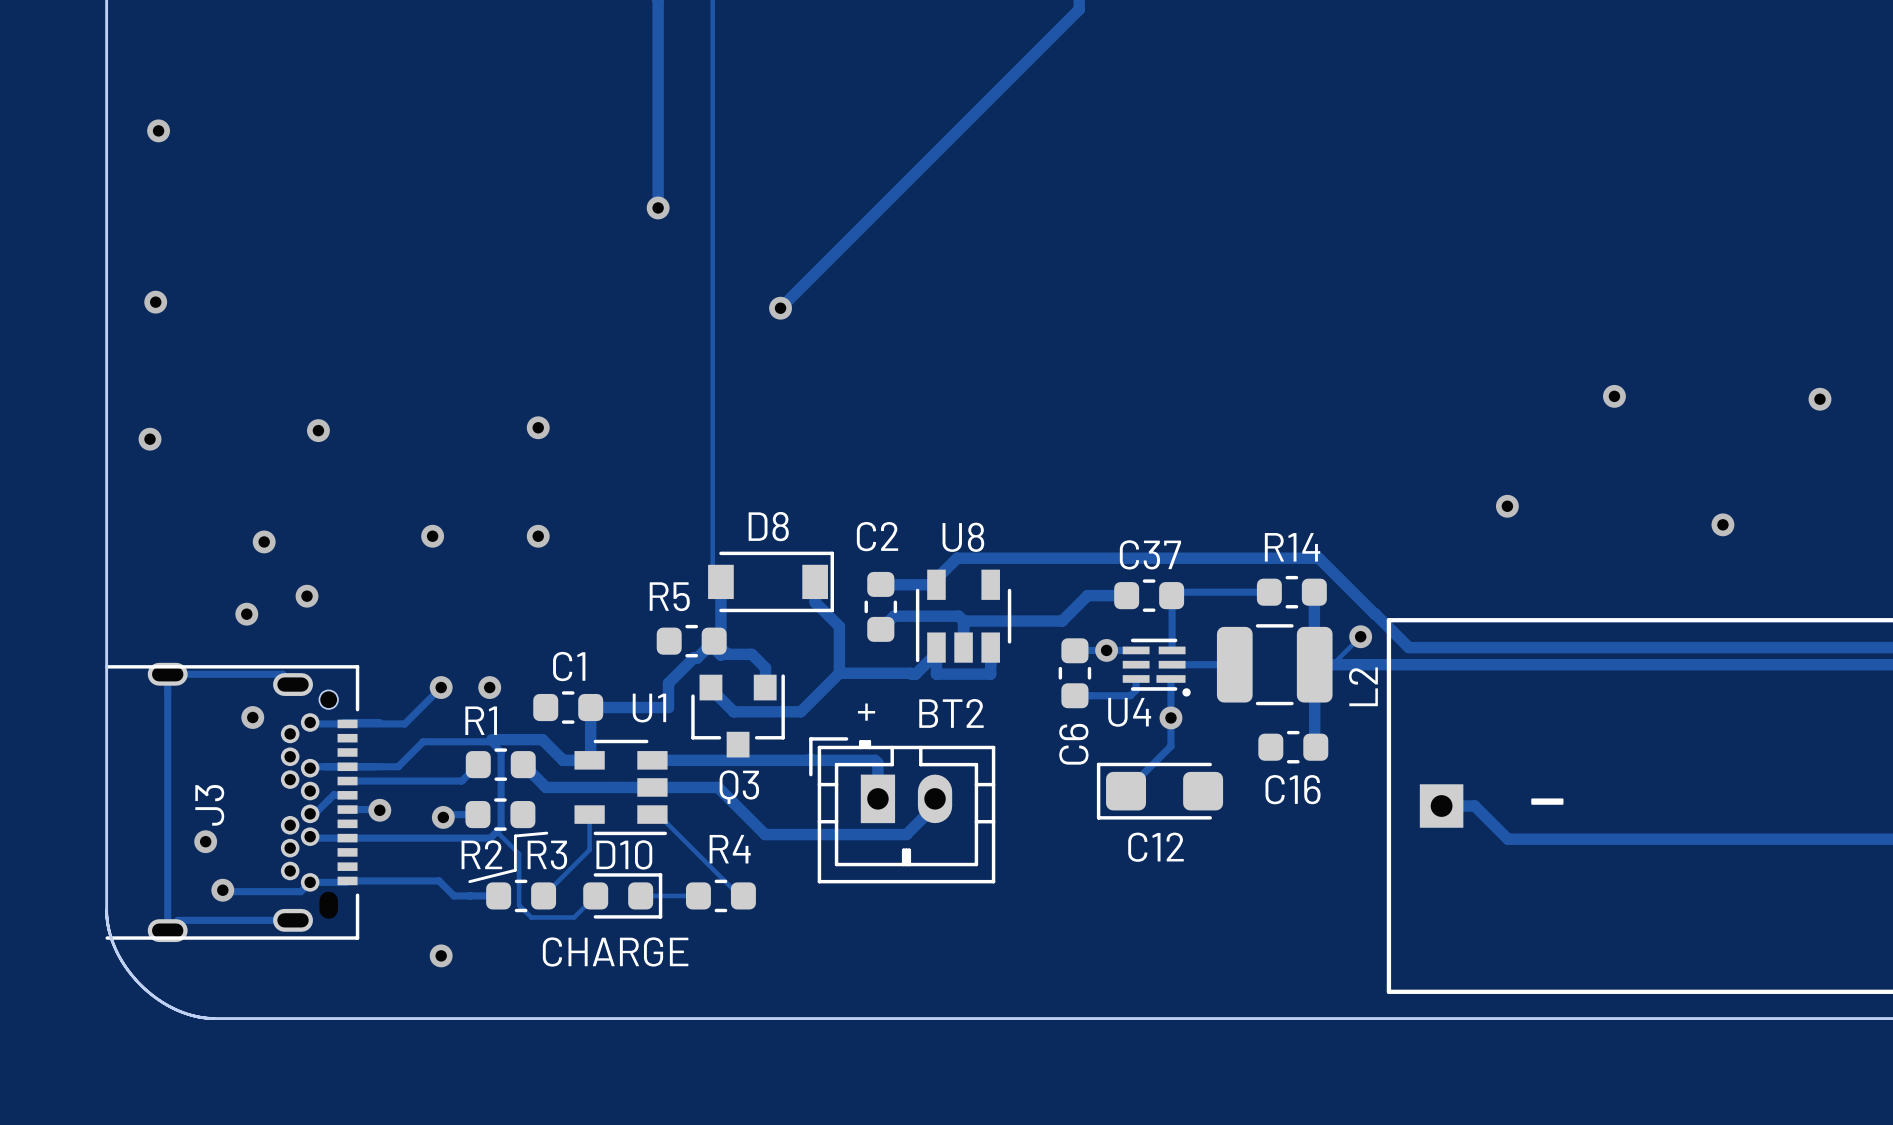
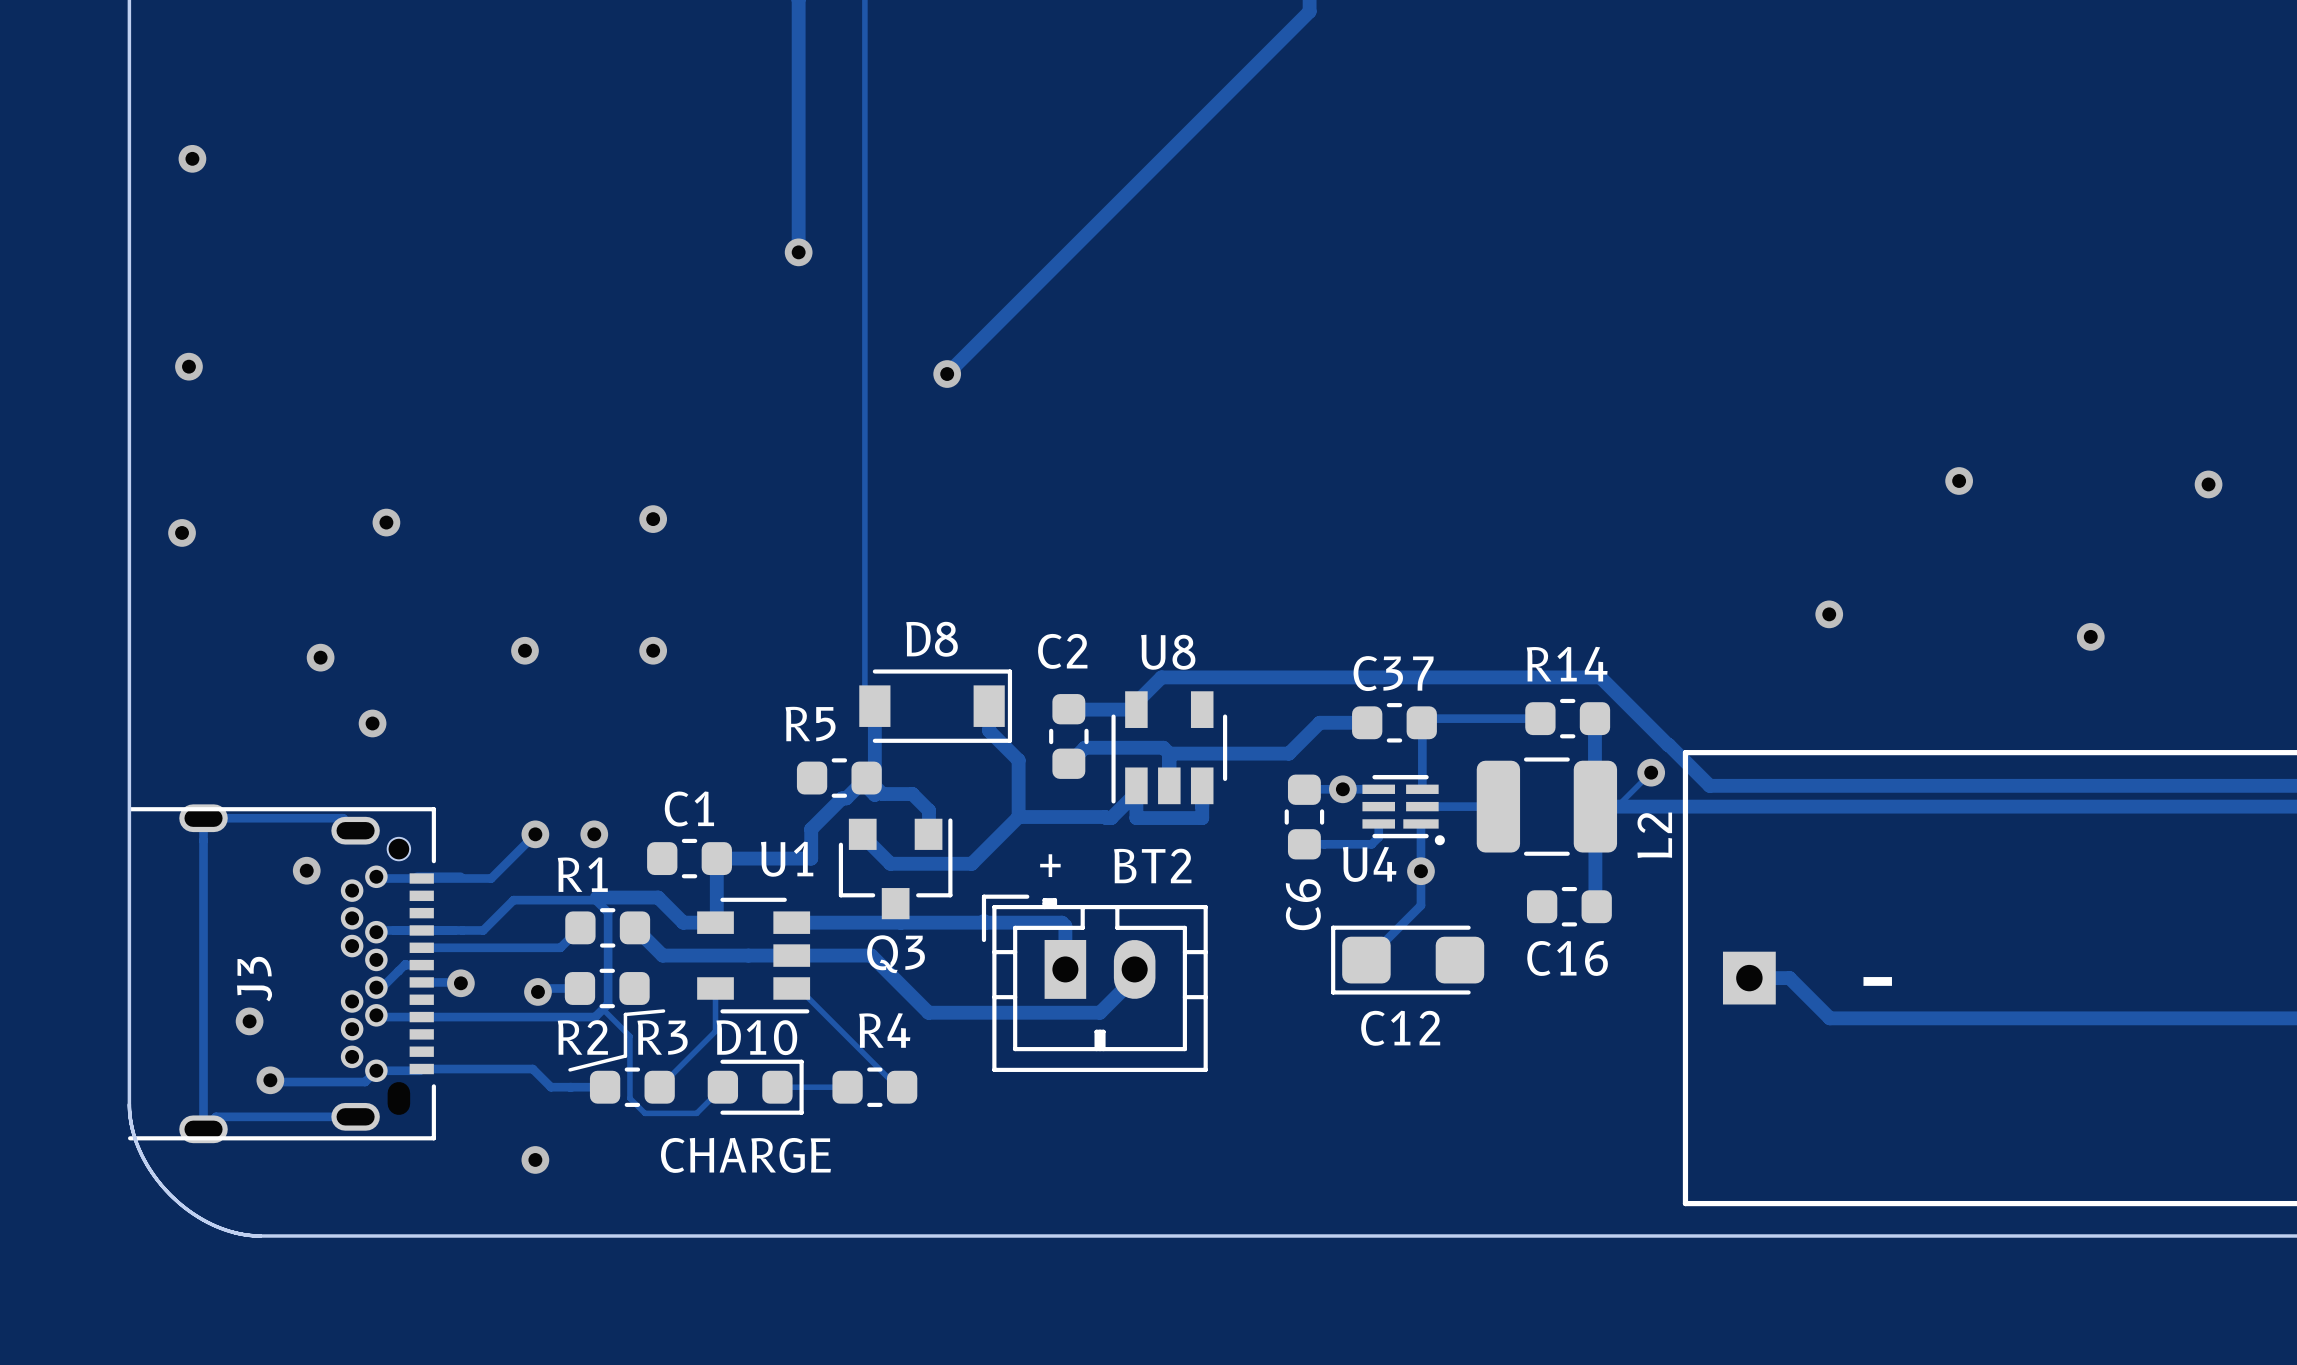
via: (246, 614) -> none

